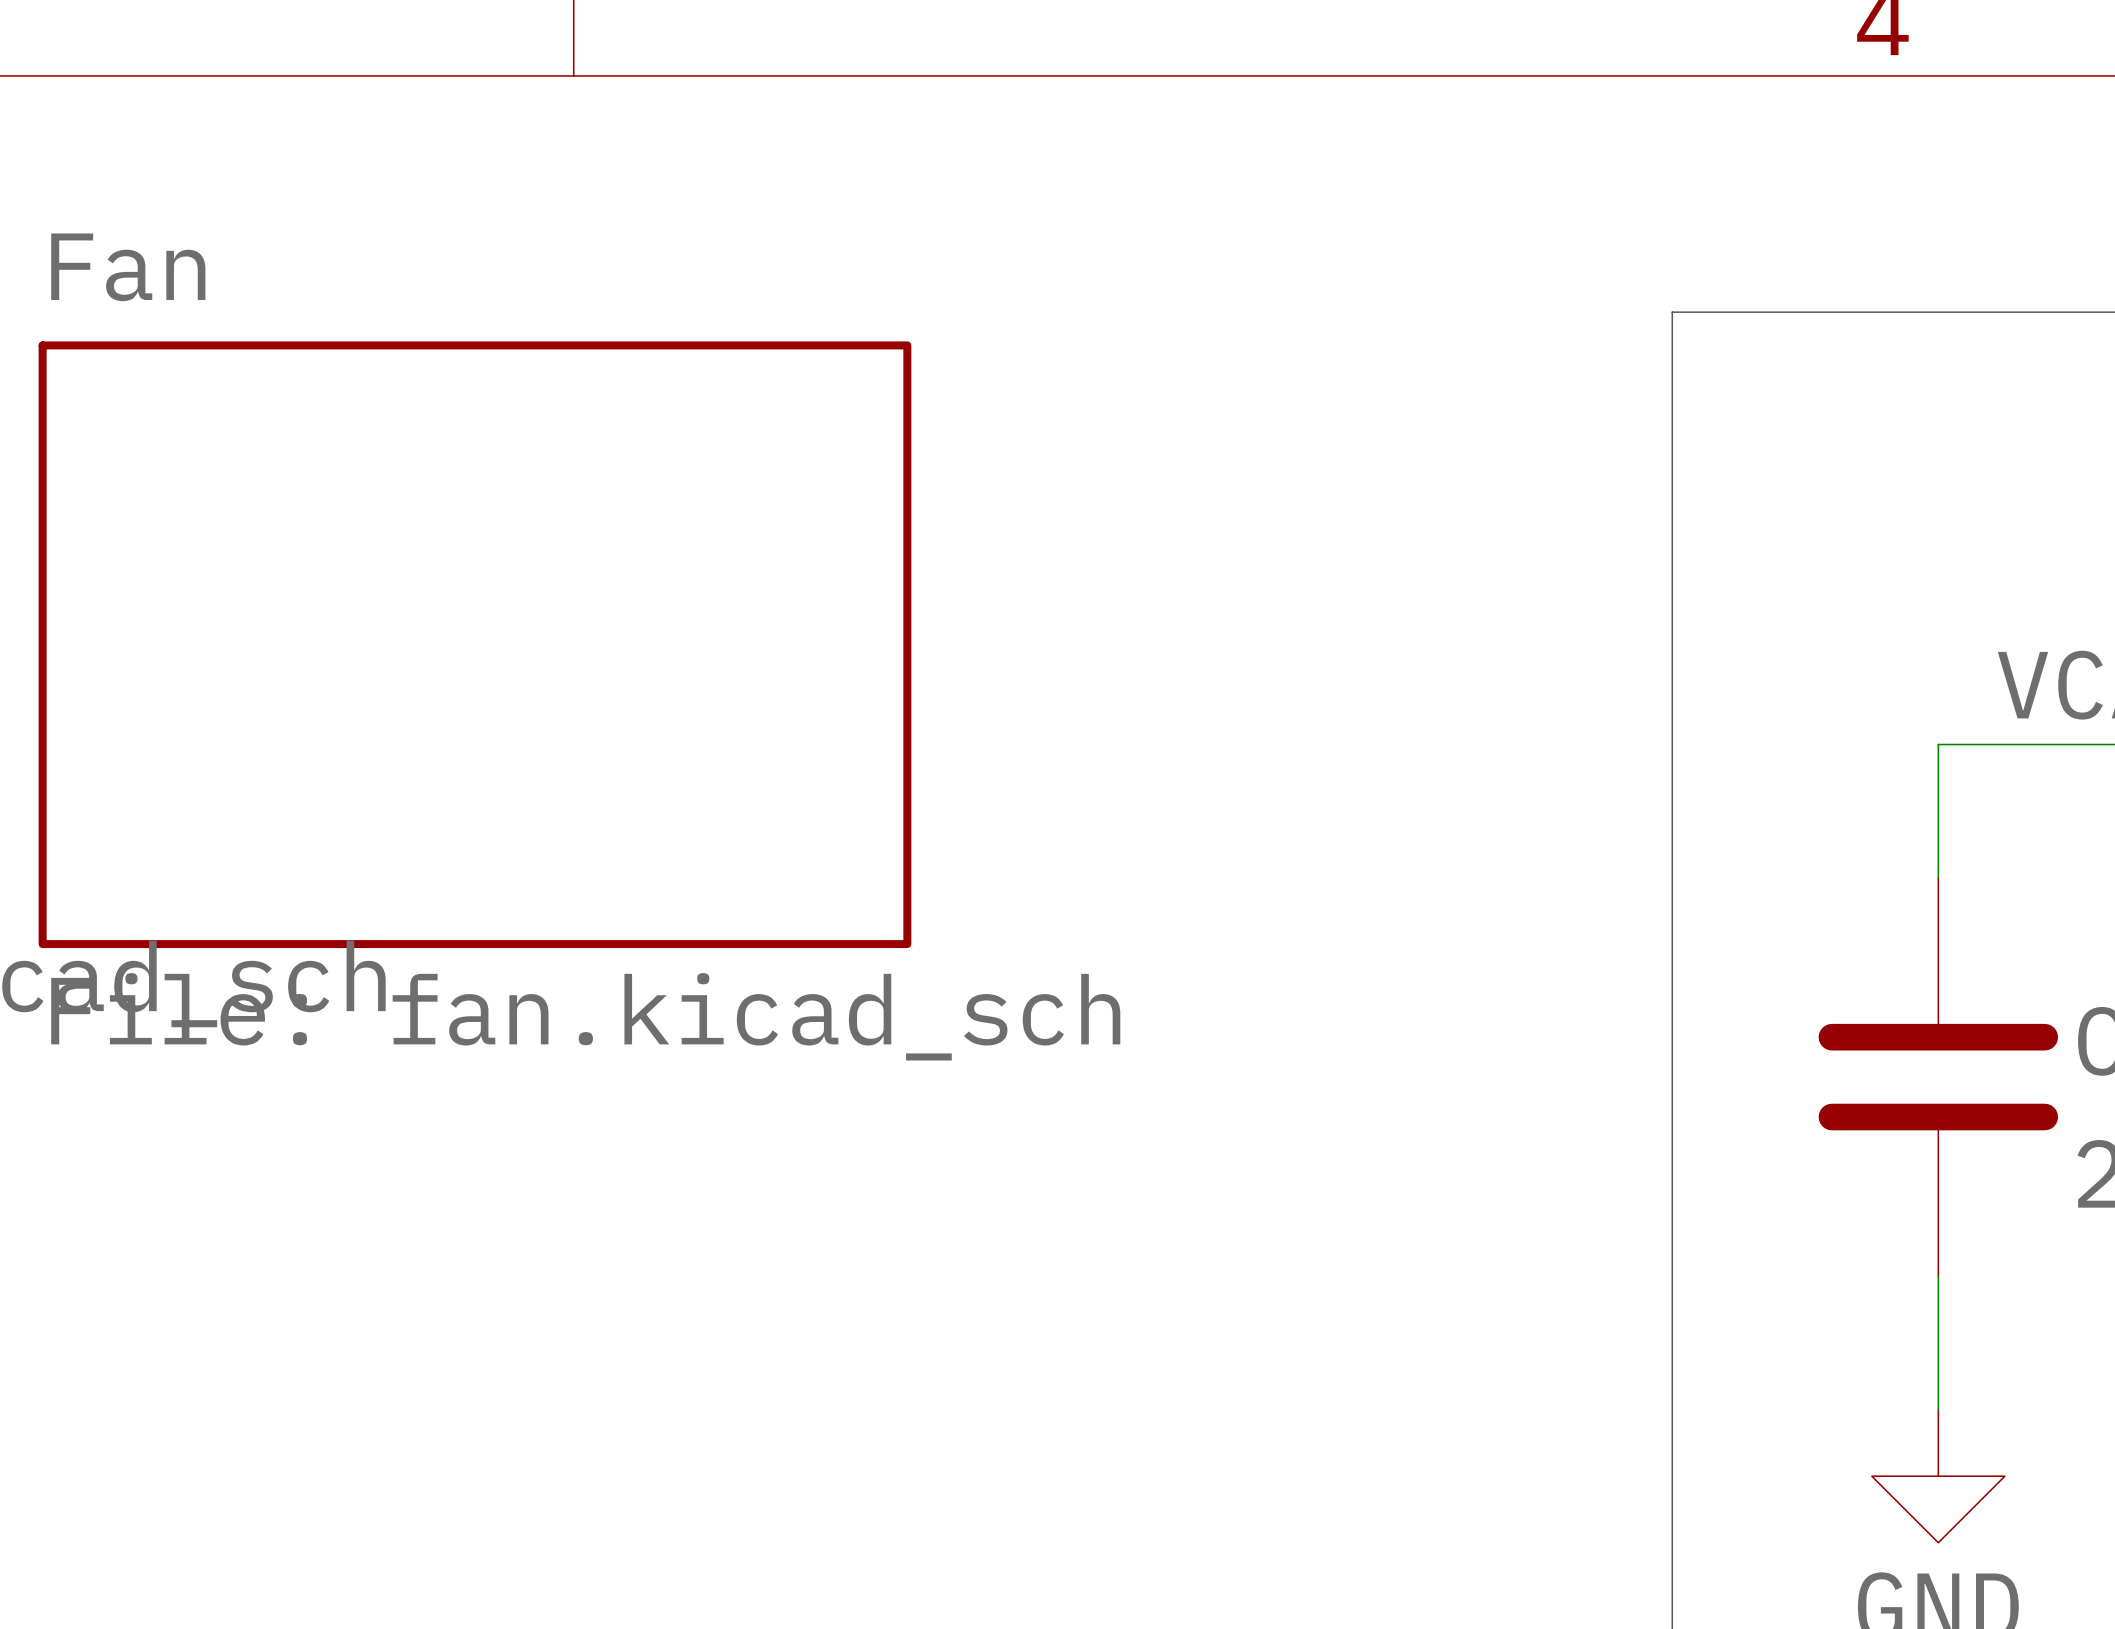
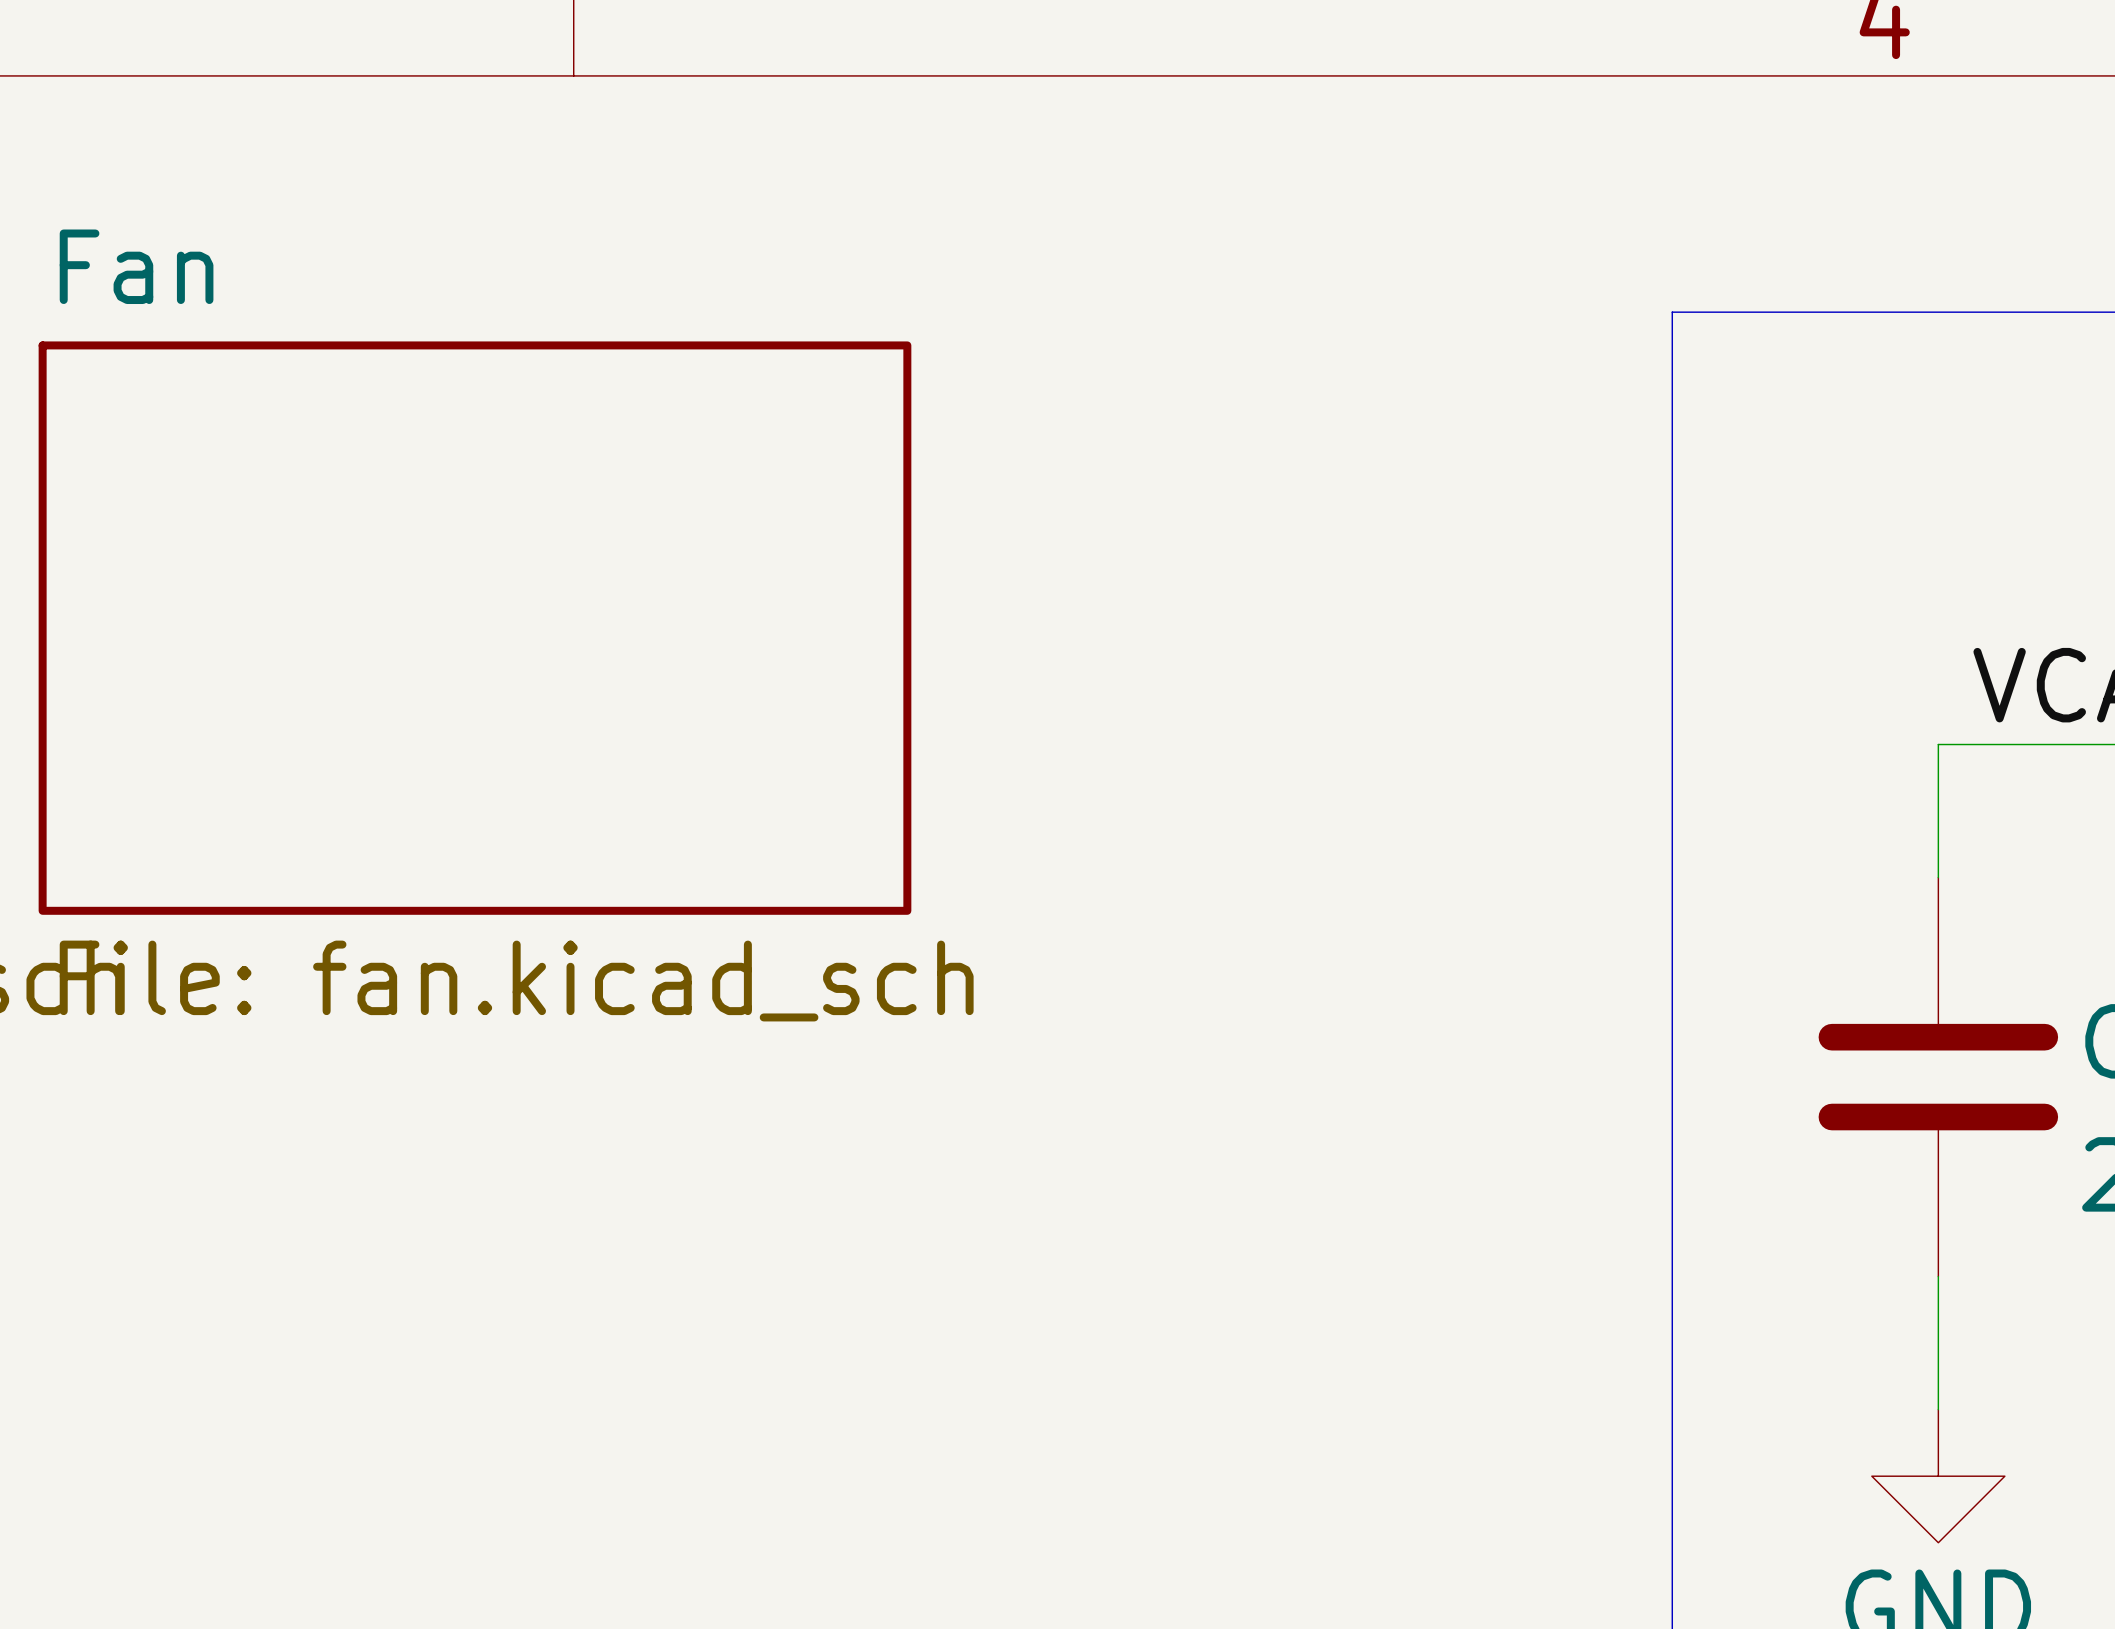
sheet Fan shape: [38, 341, 912, 949] -> [38, 341, 912, 915]
sheet Fan value position: File: fan.kicad_sch (585, 1016) -> File: fan.kicad_sch (516, 981)

